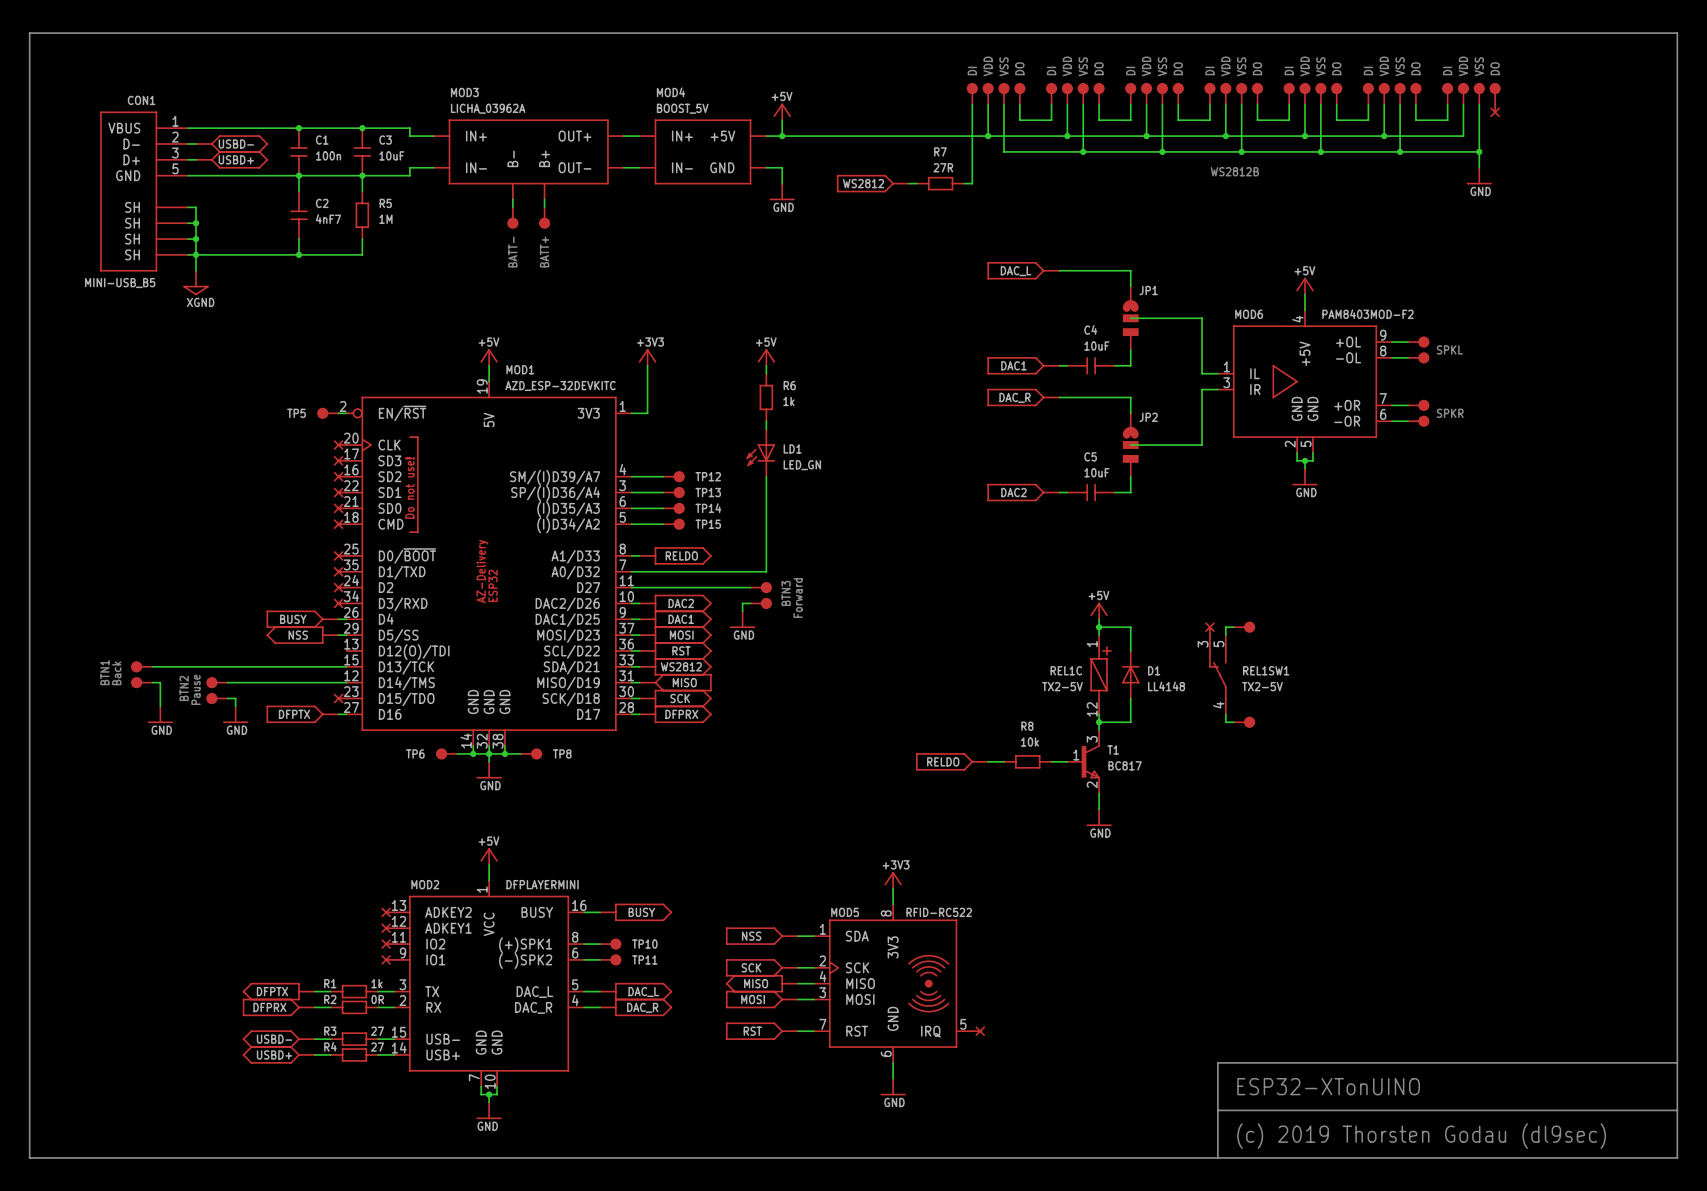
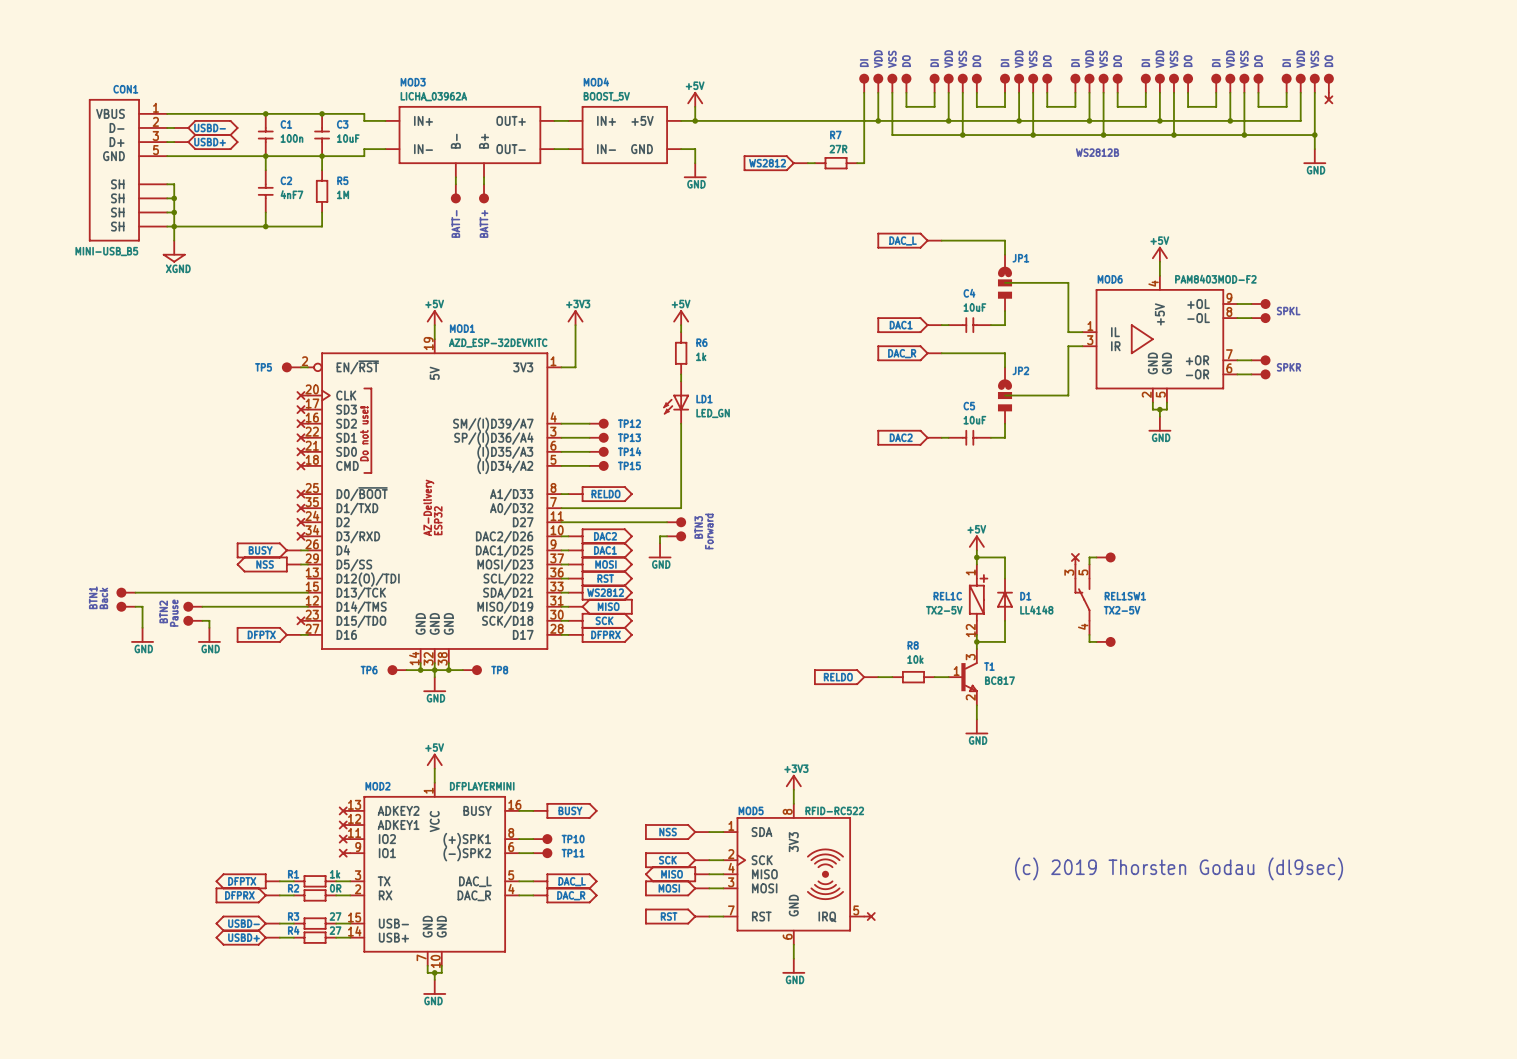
line: (29, 33) (1677, 33) (1677, 1157) (29, 1157) (29, 33) -> none
text: none -> (c) 2019 Thorsten Godau (dl9sec) (1179, 868)
line: (1677, 1062) (1217, 1062) (1217, 1157) -> none
text: ESP32-XTonUINO (1328, 1086) -> none
line: (1217, 1110) (1677, 1110) -> none
text: (c) 2019 Thorsten Godau (dl9sec) (1421, 1136) -> none

